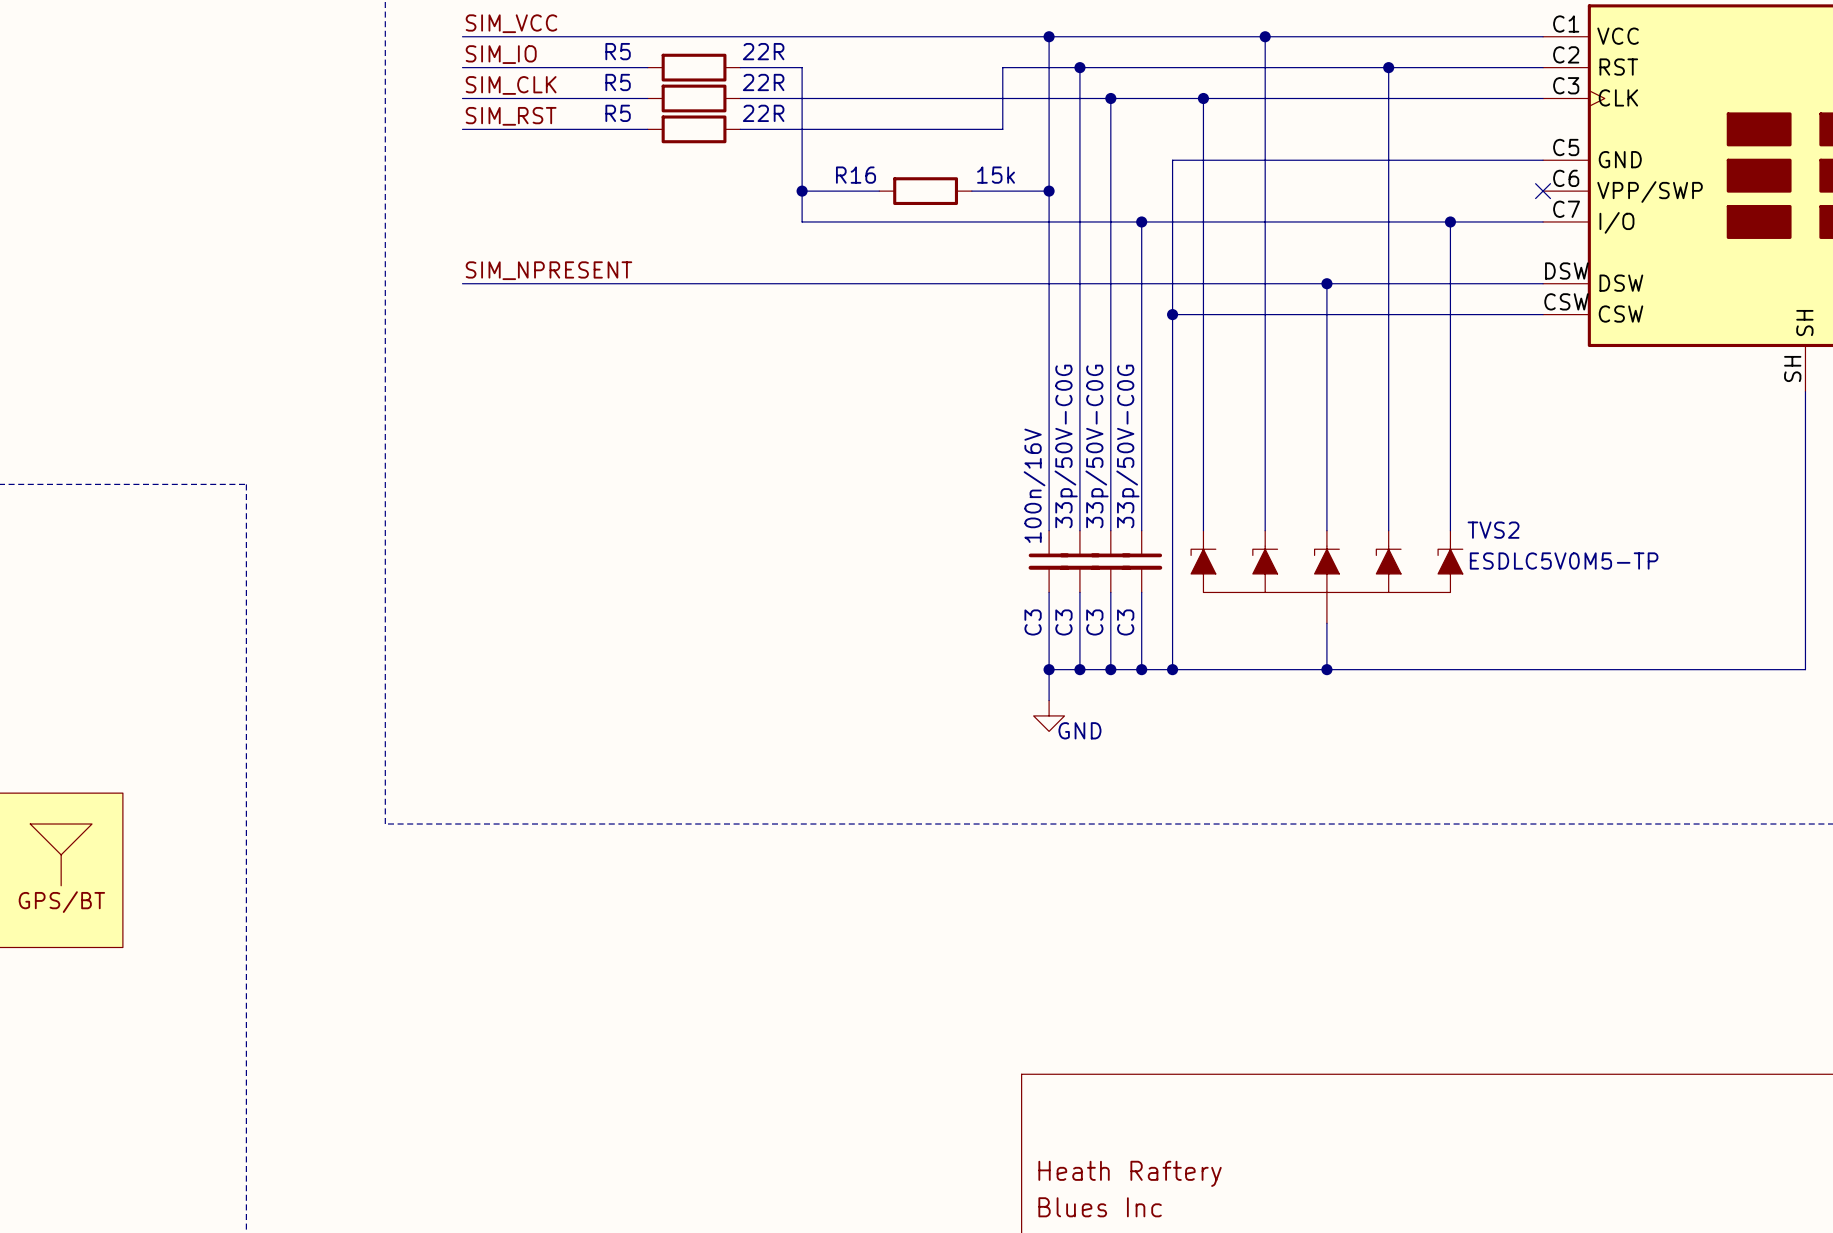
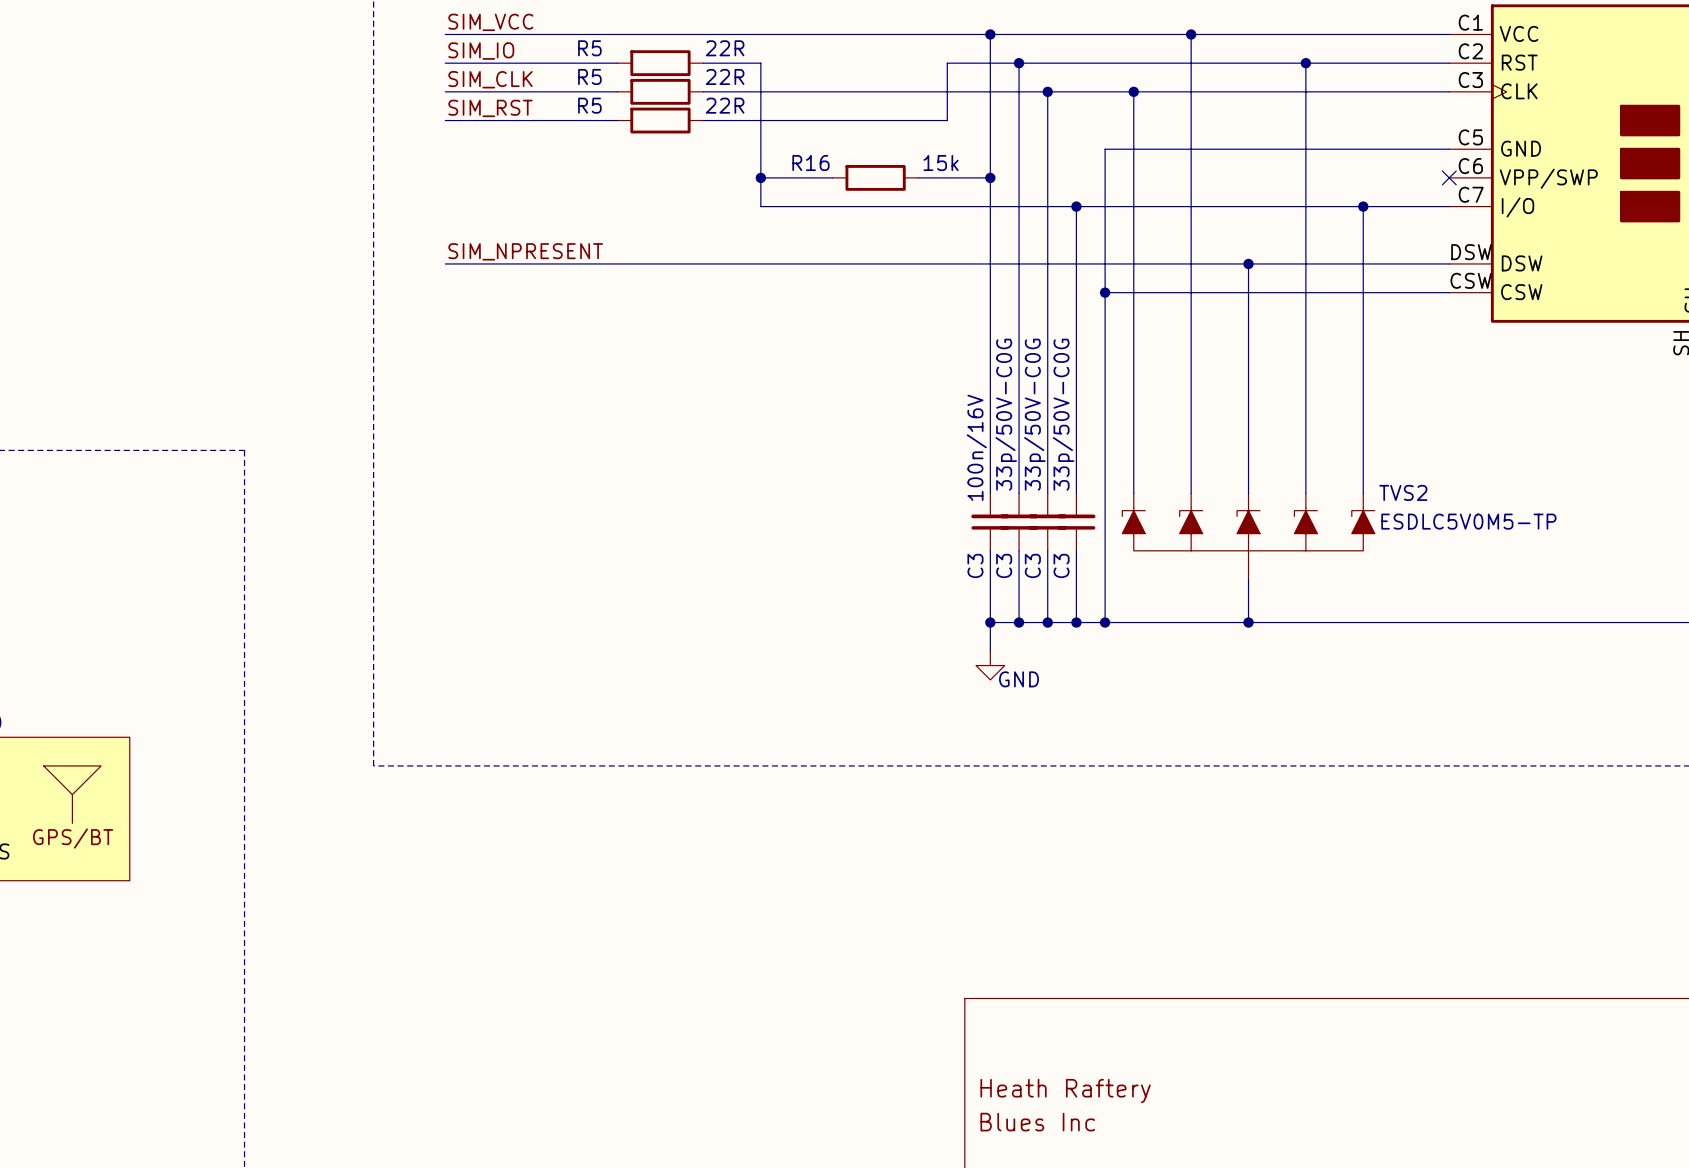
C3 rotation: 0° (1049, 561) -> 180° (990, 522)
C3 rotation: 0° (1079, 561) -> 180° (1019, 522)
C3 rotation: 0° (1110, 561) -> 180° (1047, 522)
C3 rotation: 0° (1141, 561) -> 180° (1076, 522)

